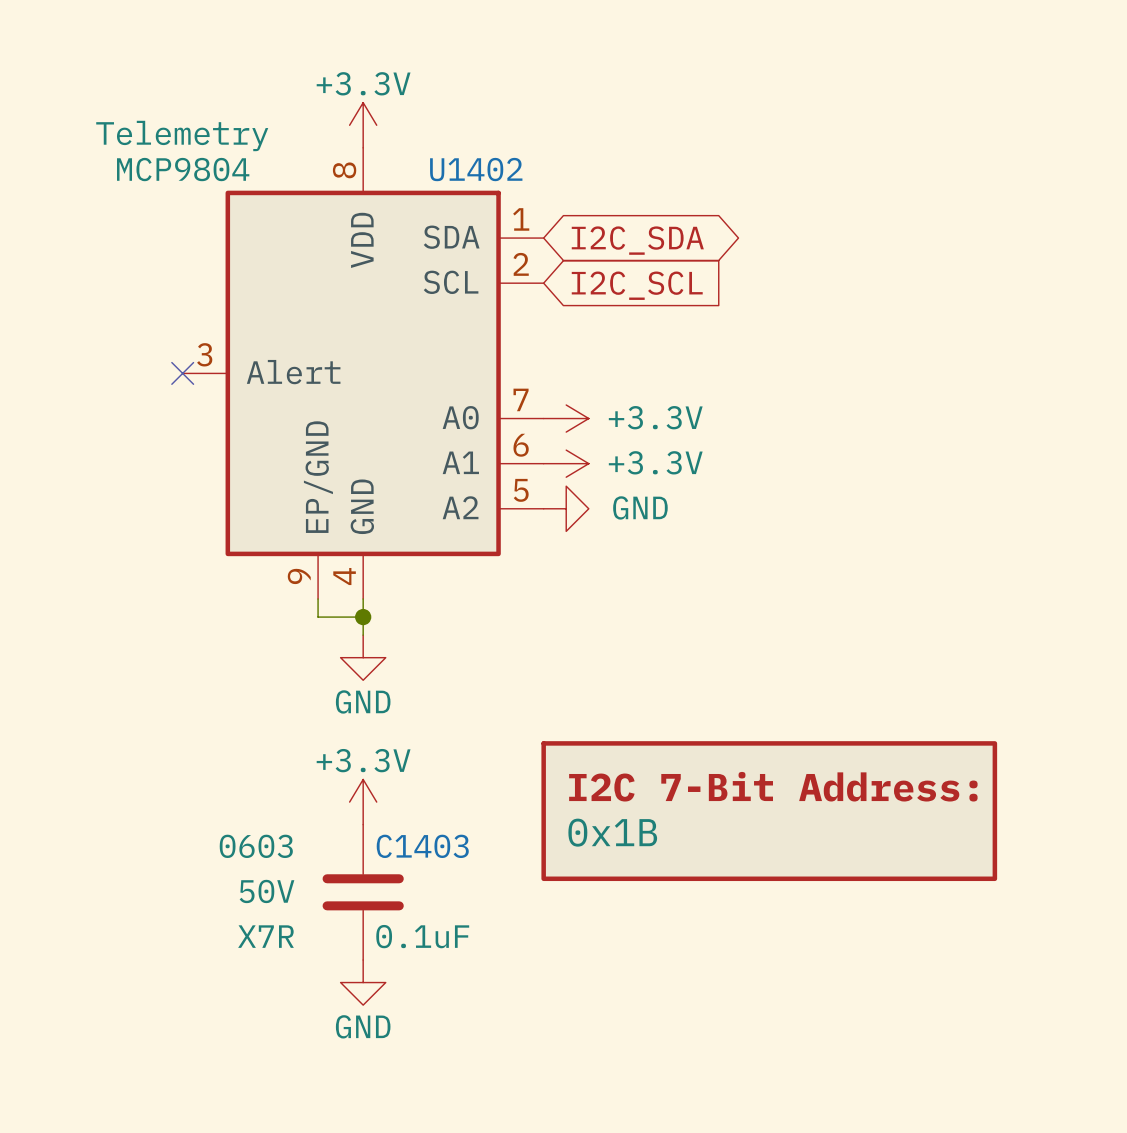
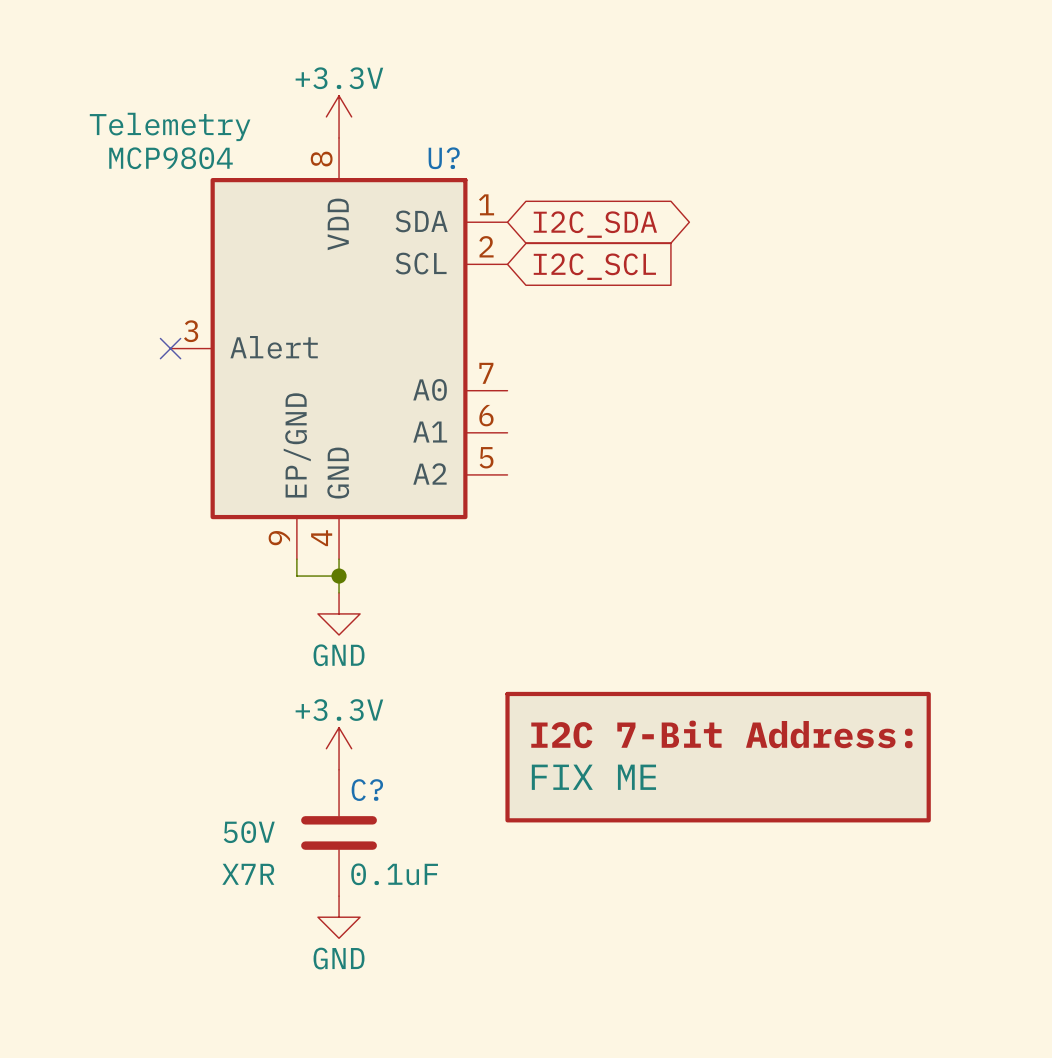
U1402 name: U1402 (476, 169) -> U? (444, 158)
power symbol: +3.3V (566, 418) -> none
power symbol: +3.3V (566, 463) -> none
power symbol: GND (566, 508) -> none
part value: 0x1B (612, 832) -> FIX ME (593, 777)
C1403 text: 0603 (256, 846) -> none
C1403 name: C1403 (422, 846) -> C? (367, 790)

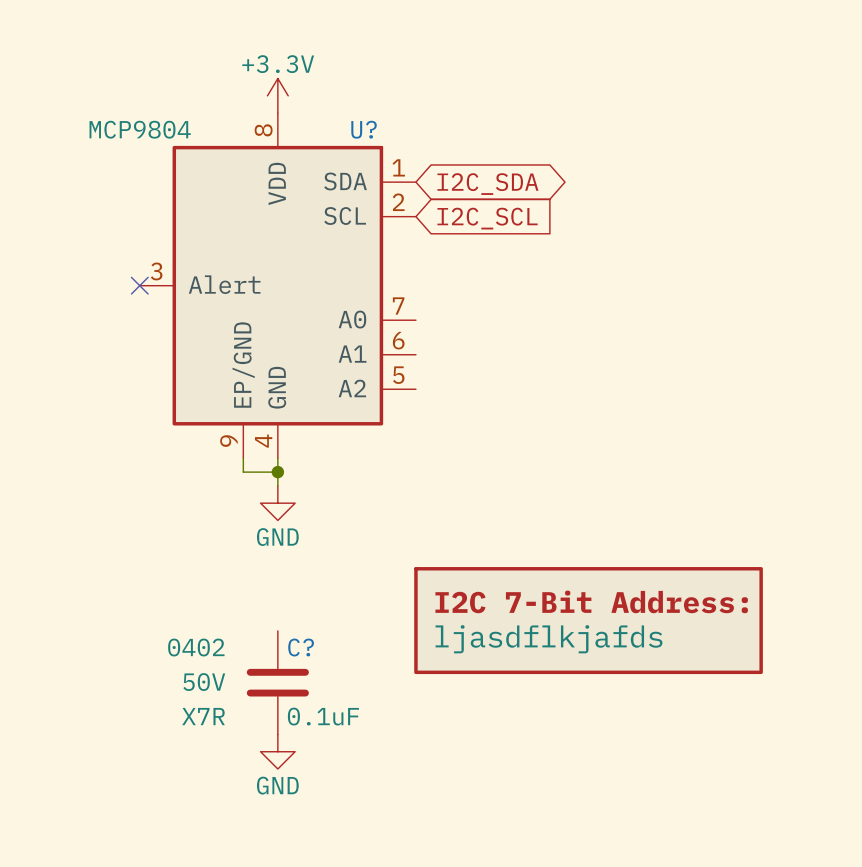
U? text: Telemetry (170, 126) -> none
power symbol: +3.3V (339, 748) -> none
part value: FIX ME (593, 777) -> ljasdflkjafds (549, 639)
C? text: none -> 0402 (196, 647)

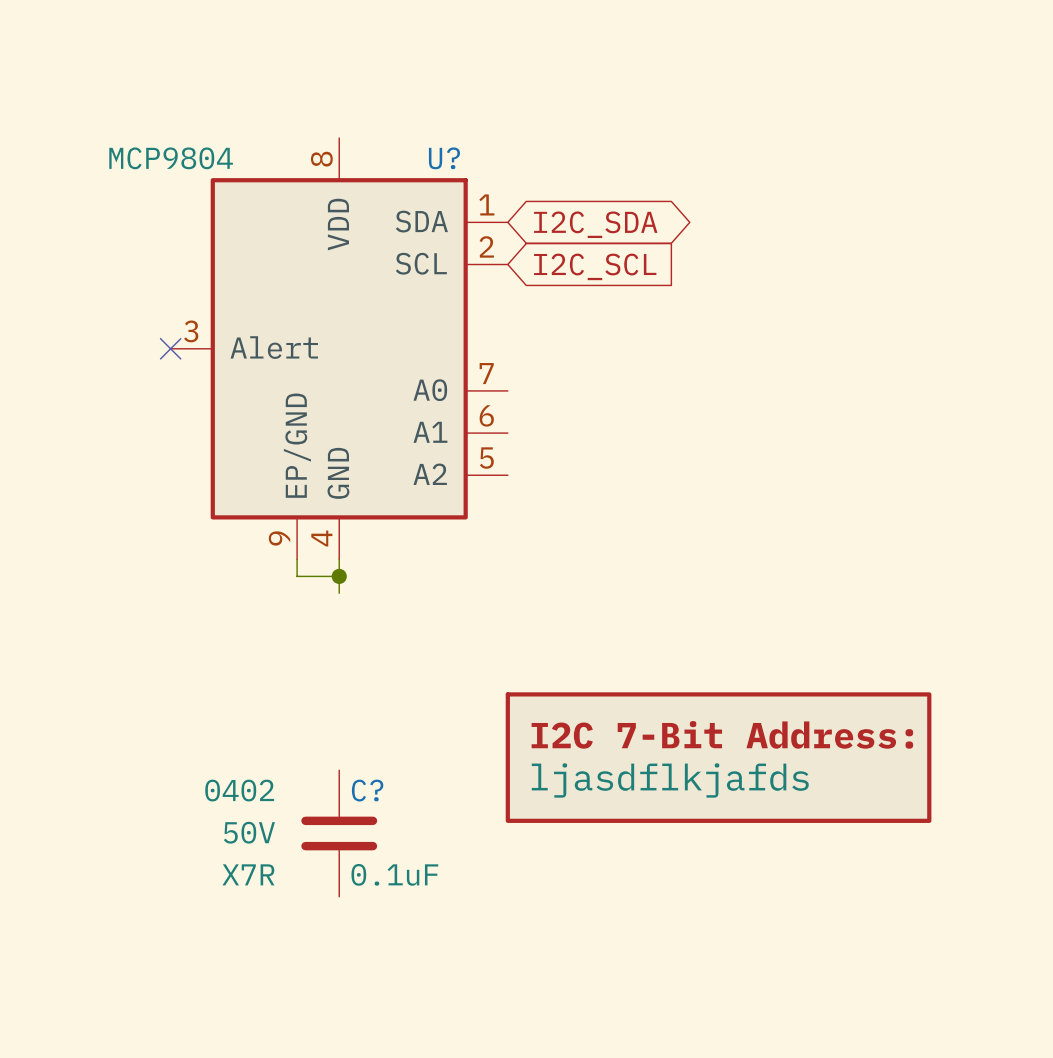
power symbol: +3.3V (277, 95) -> none
power symbol: GND (277, 503) -> none
power symbol: GND (277, 751) -> none

